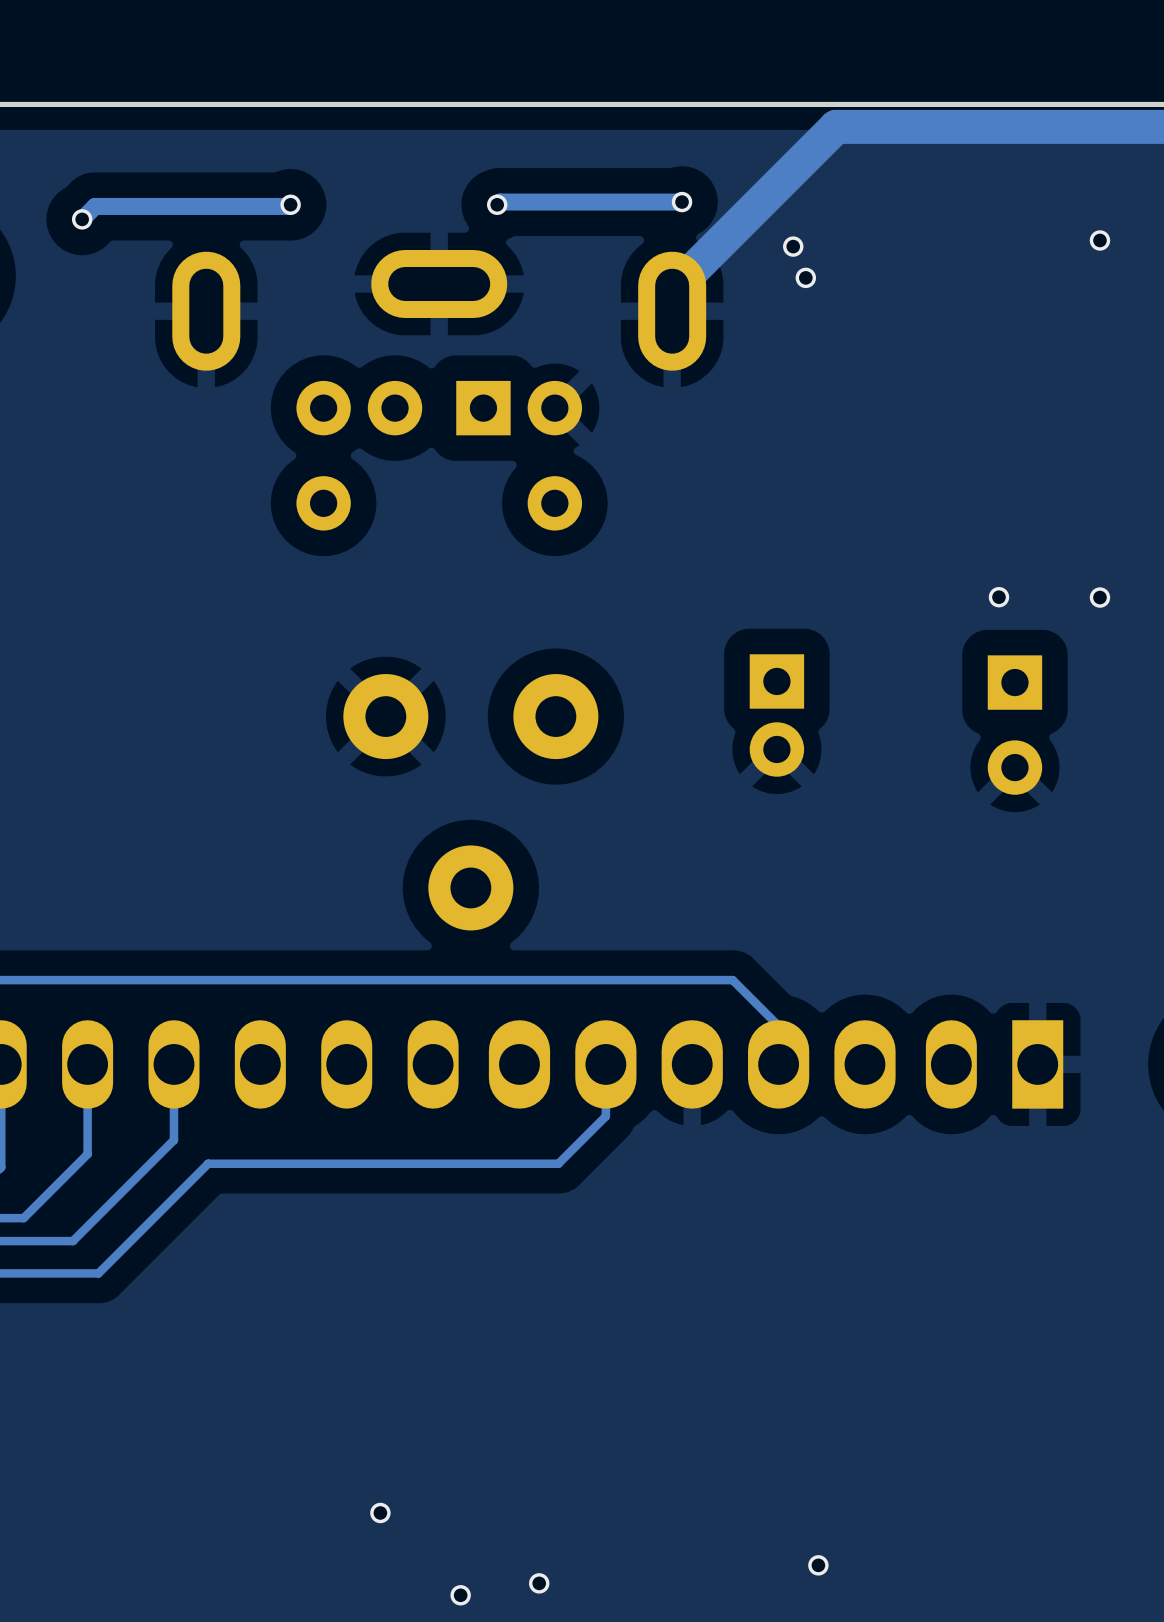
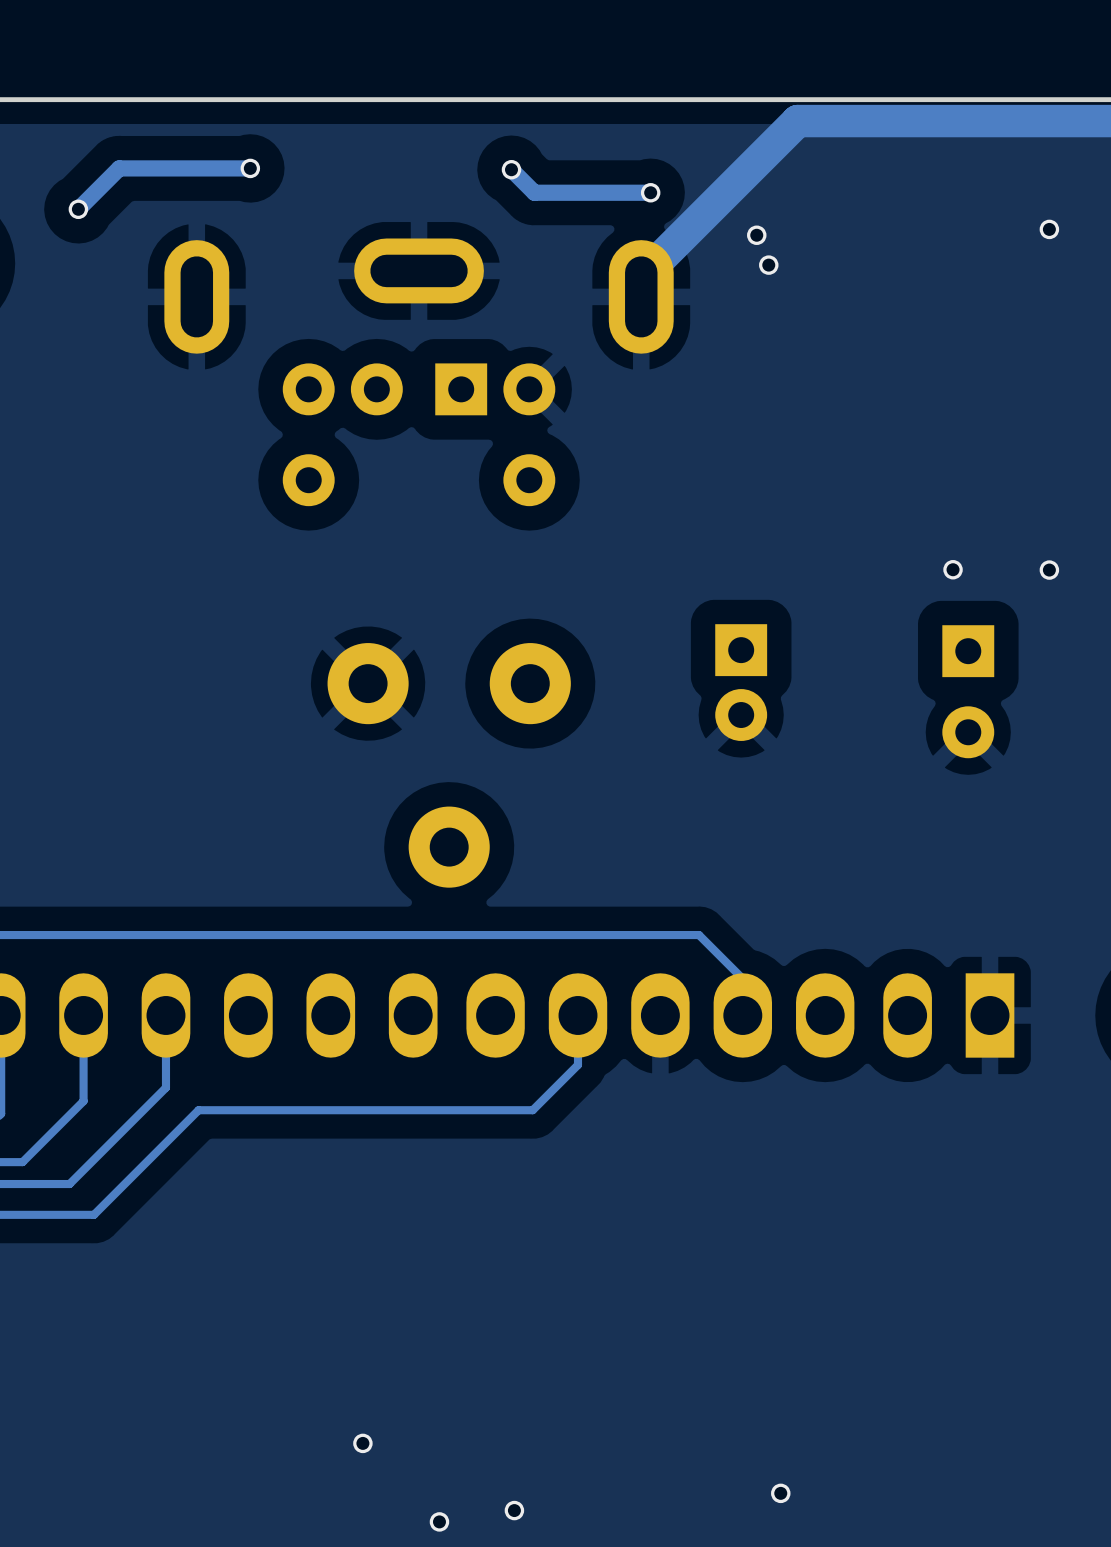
track: (560, 202) (499, 202) (497, 204) -> (534, 192) (511, 169)
track: (290, 204) (288, 206) (95, 206) -> (250, 168) (119, 168) (90, 196)
via position: (290, 204) -> (250, 168)
via position: (497, 204) -> (511, 169)

